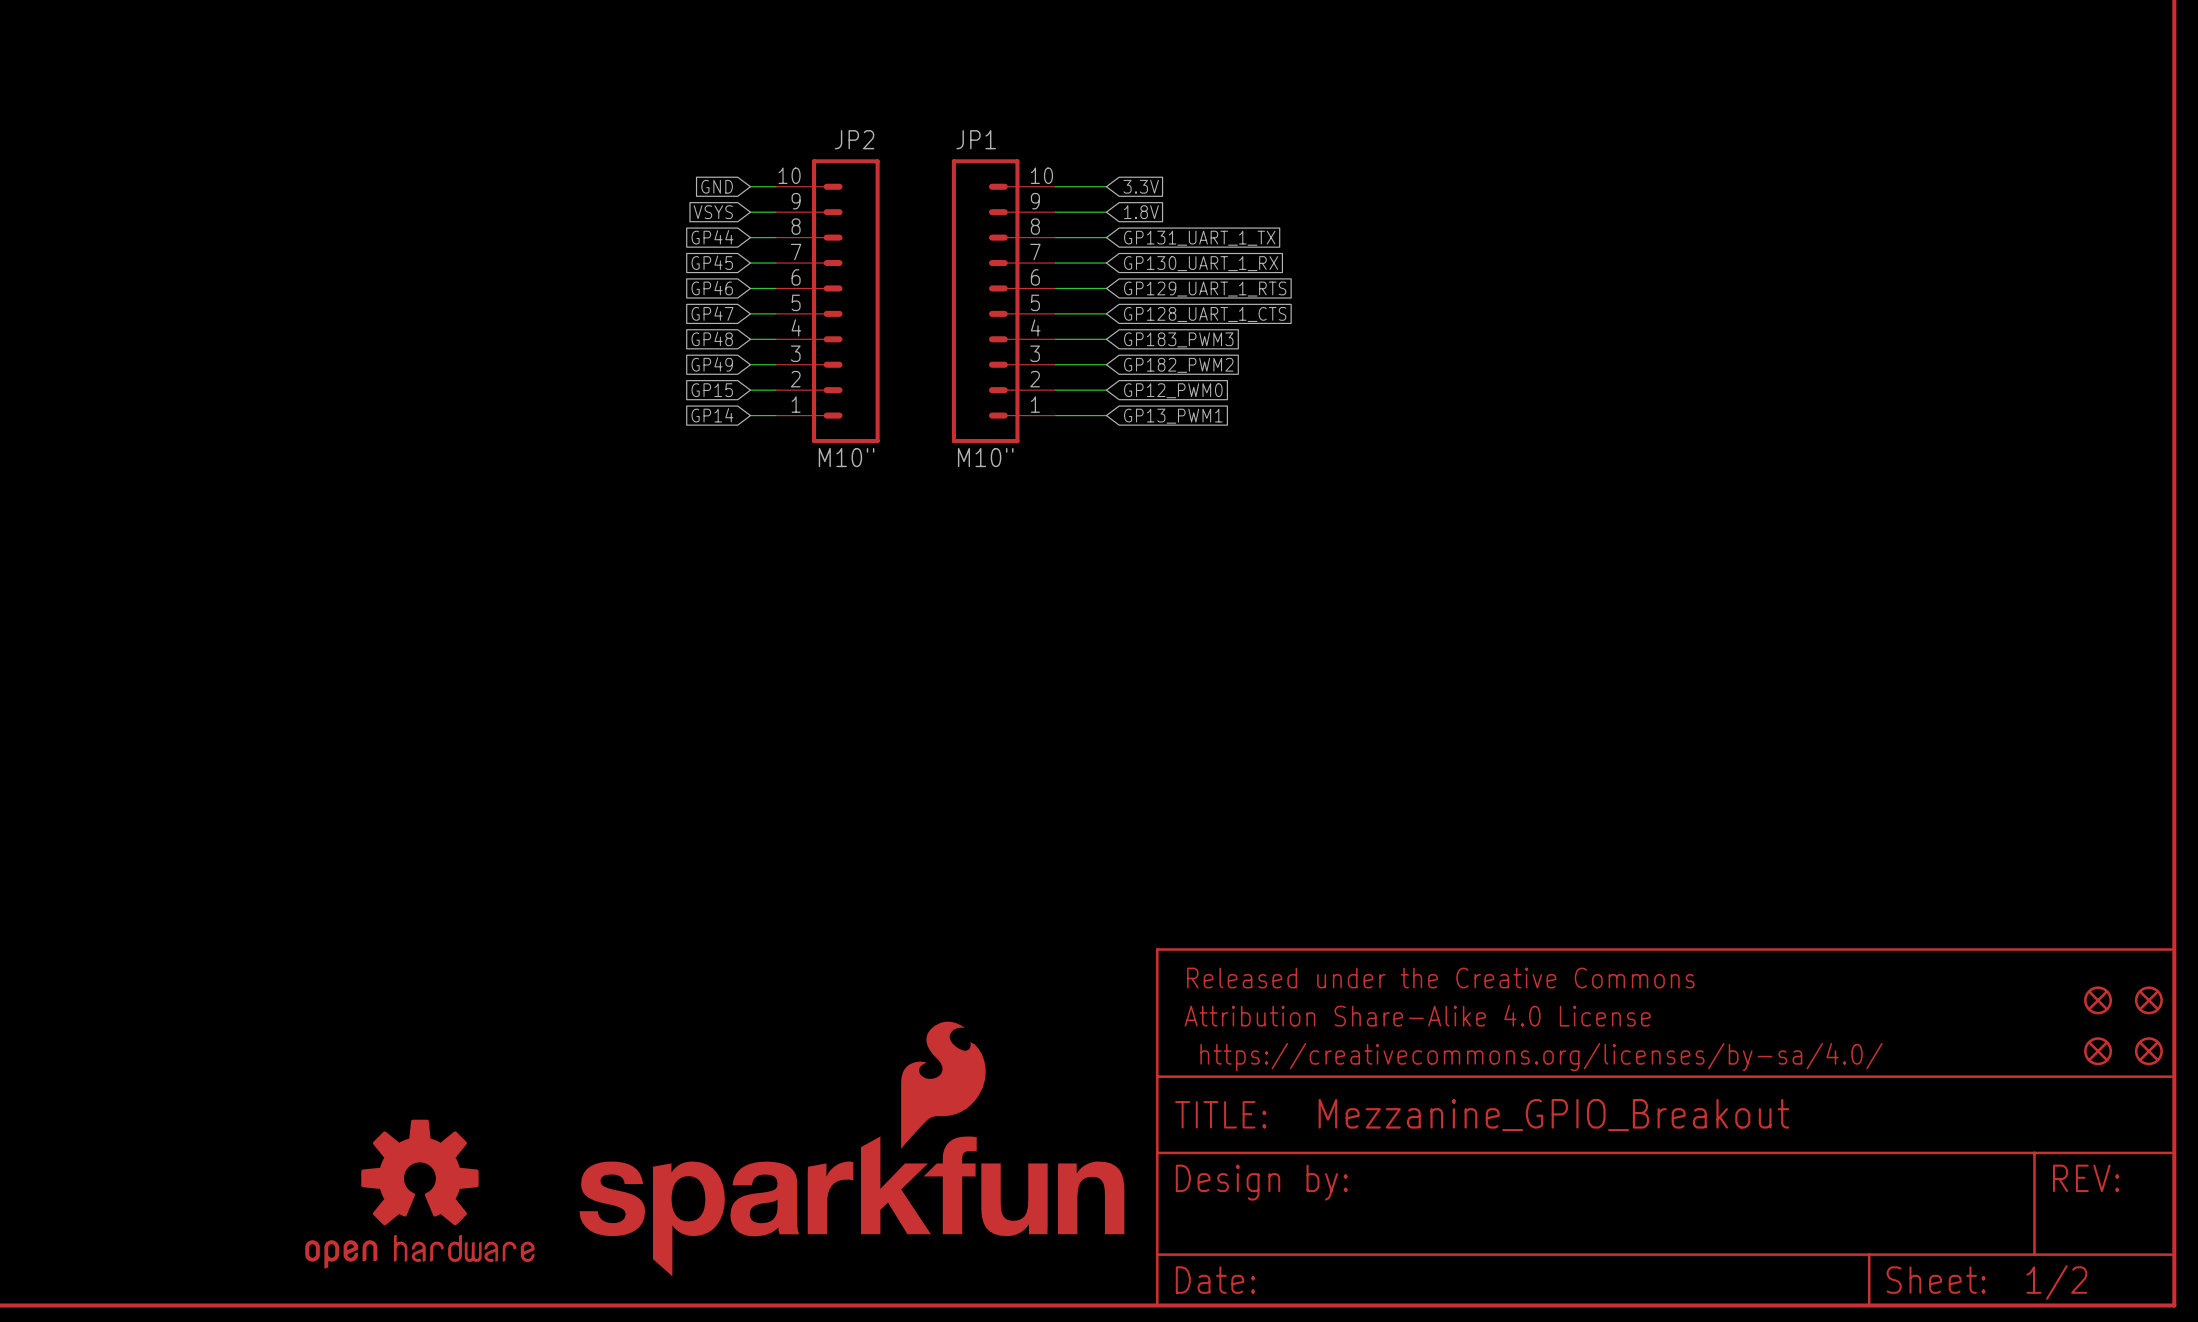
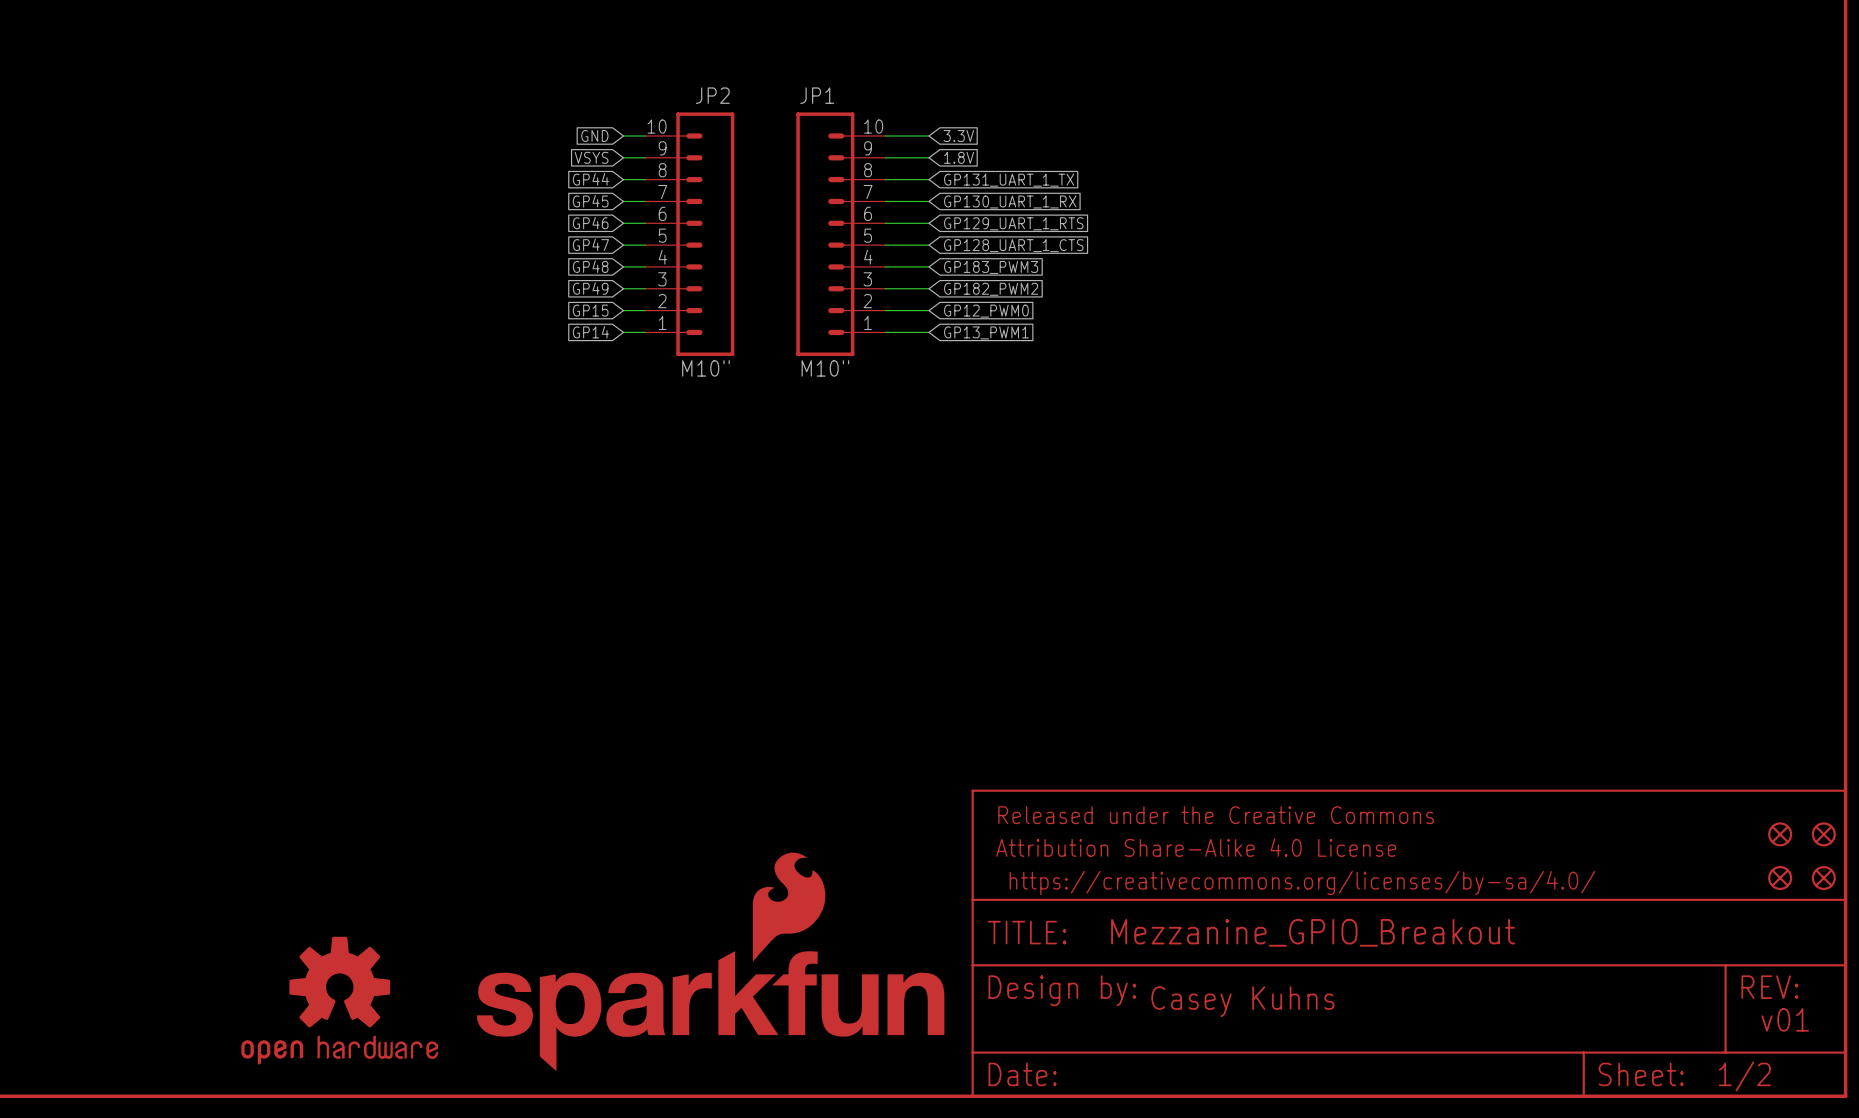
text: none -> Casey Kuhns (1242, 1001)
text: none -> v01 (1785, 1019)

